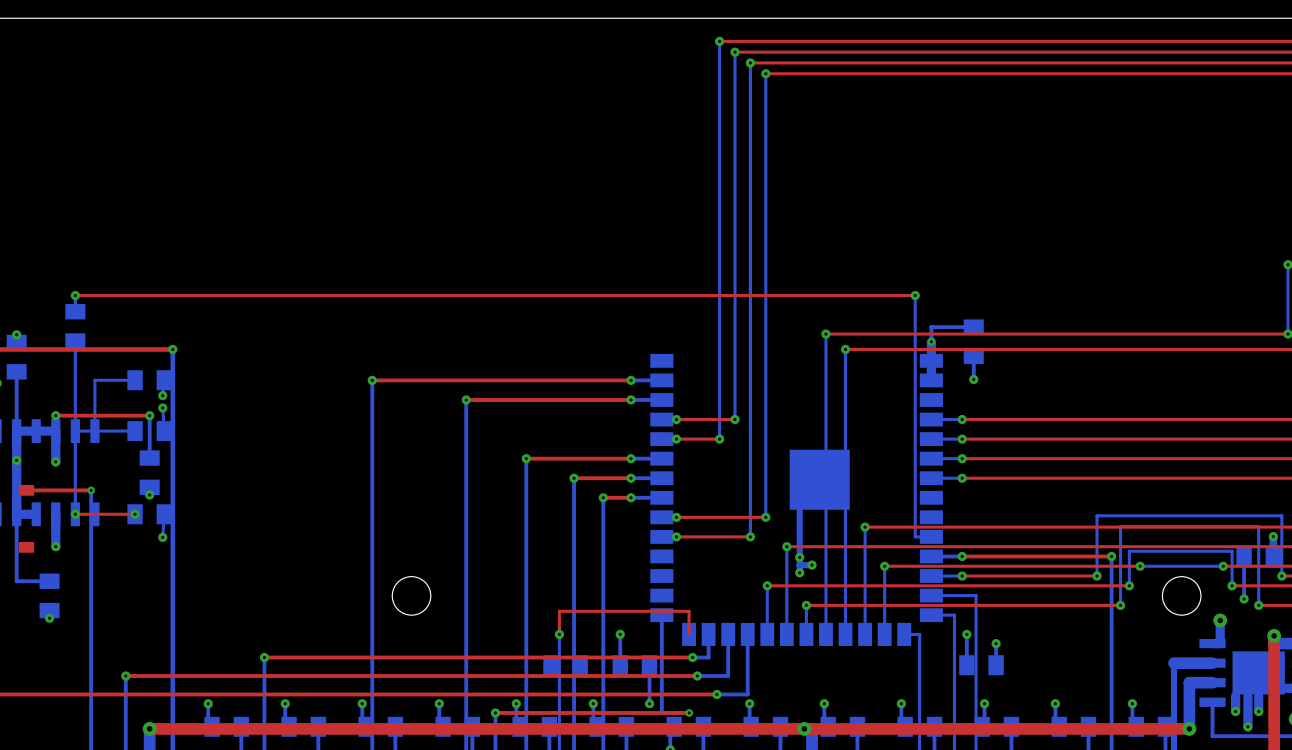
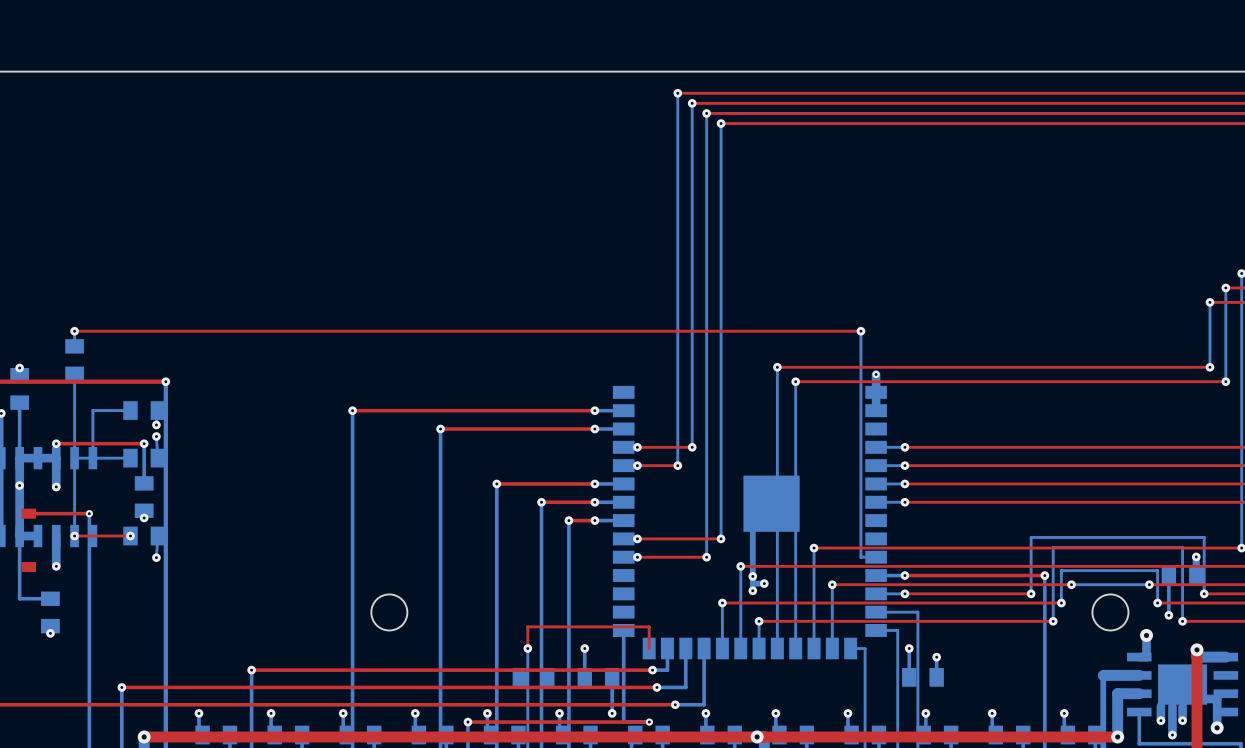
bottom track: (973, 327) (931, 327) (931, 341) -> none
part: (973, 341) -> none
bottom track: (973, 356) (973, 379) -> none
via: (973, 379) -> none

